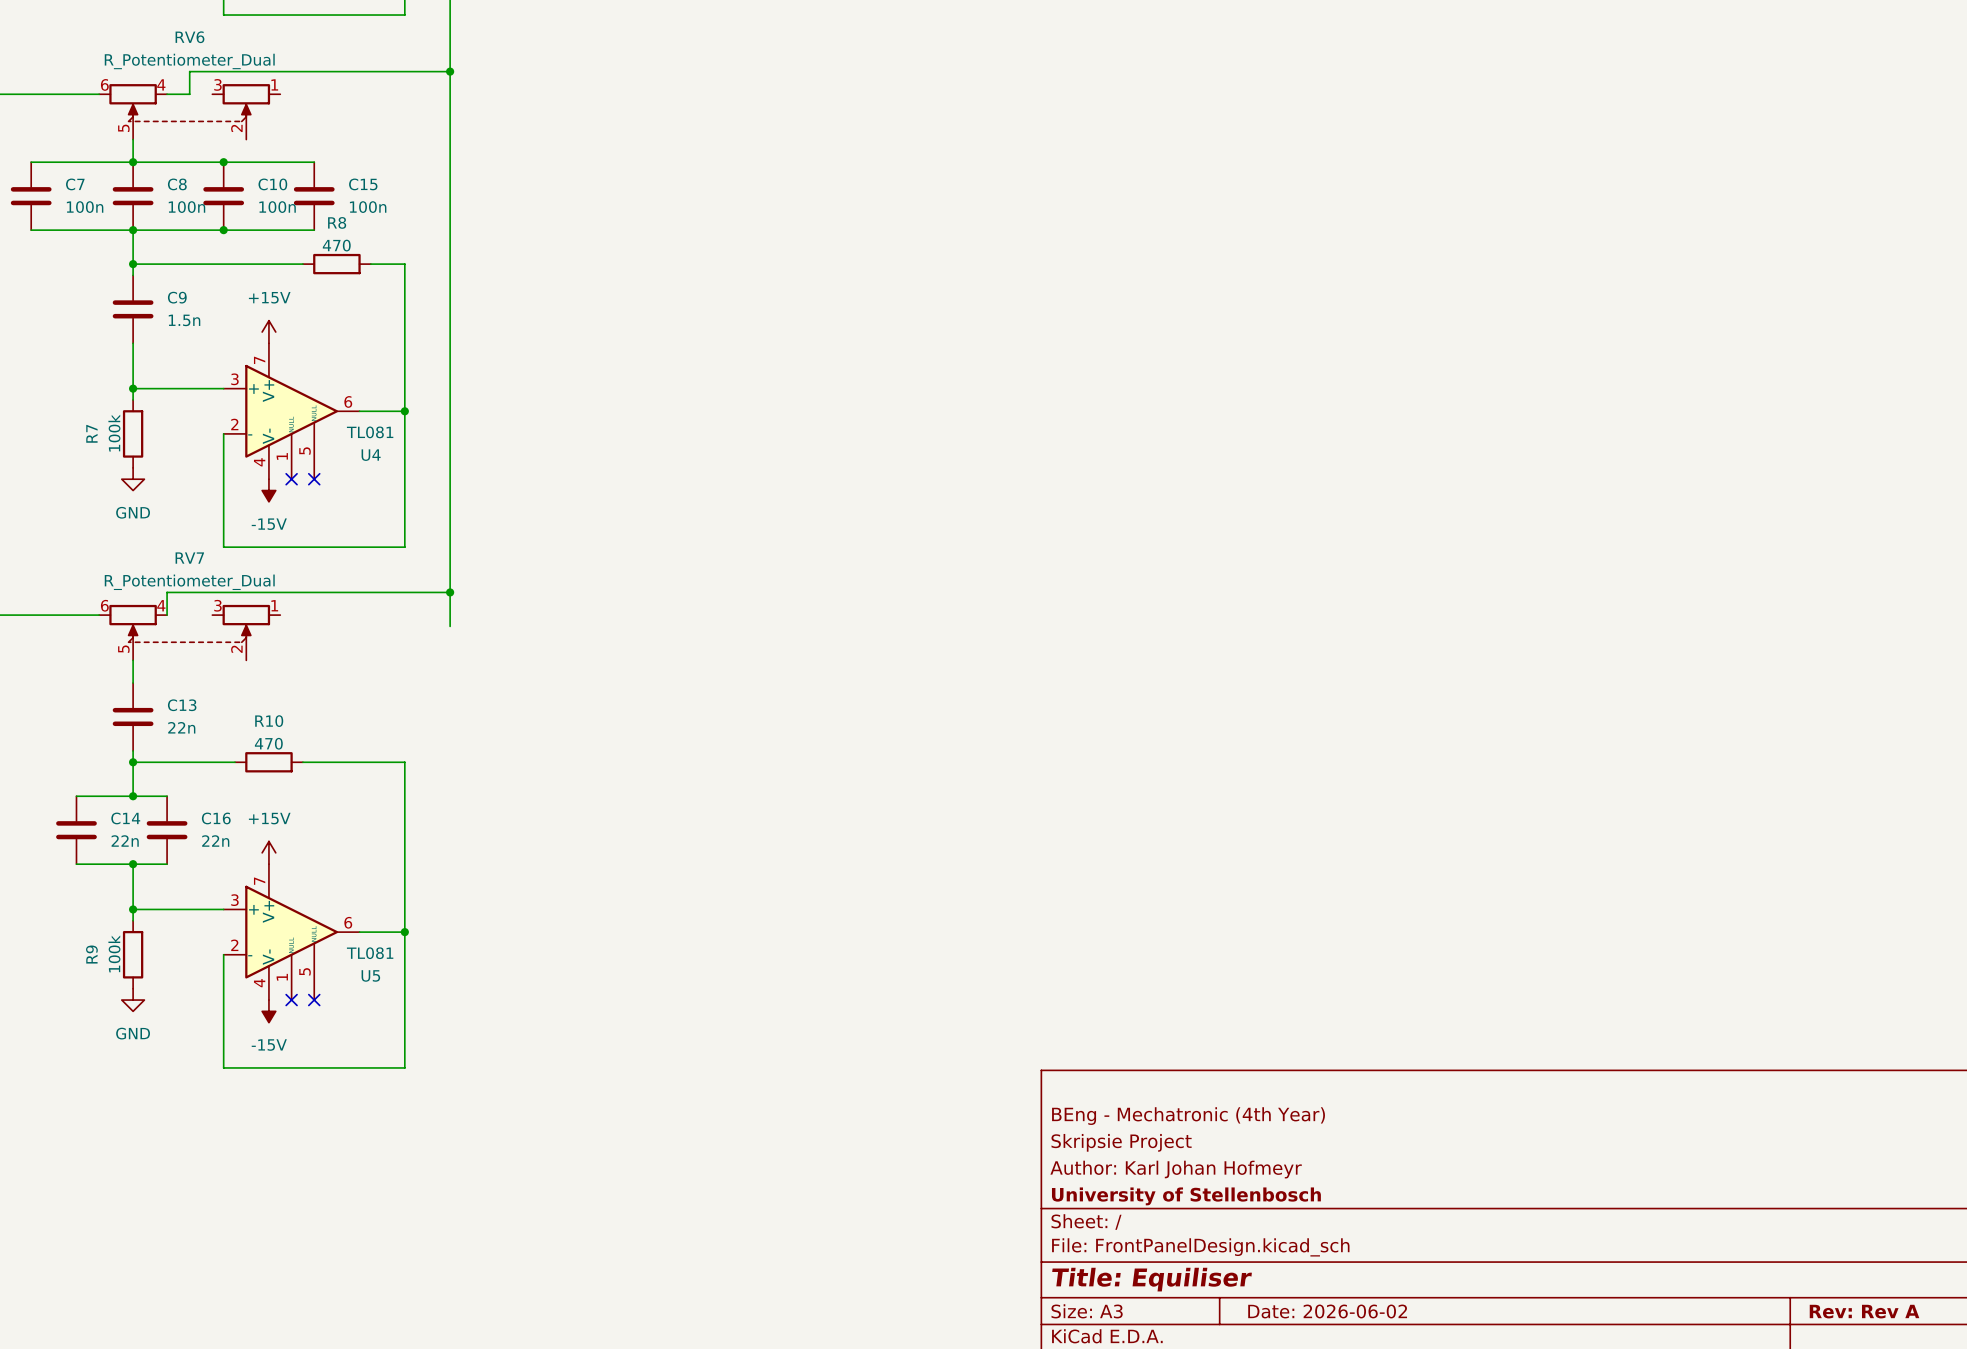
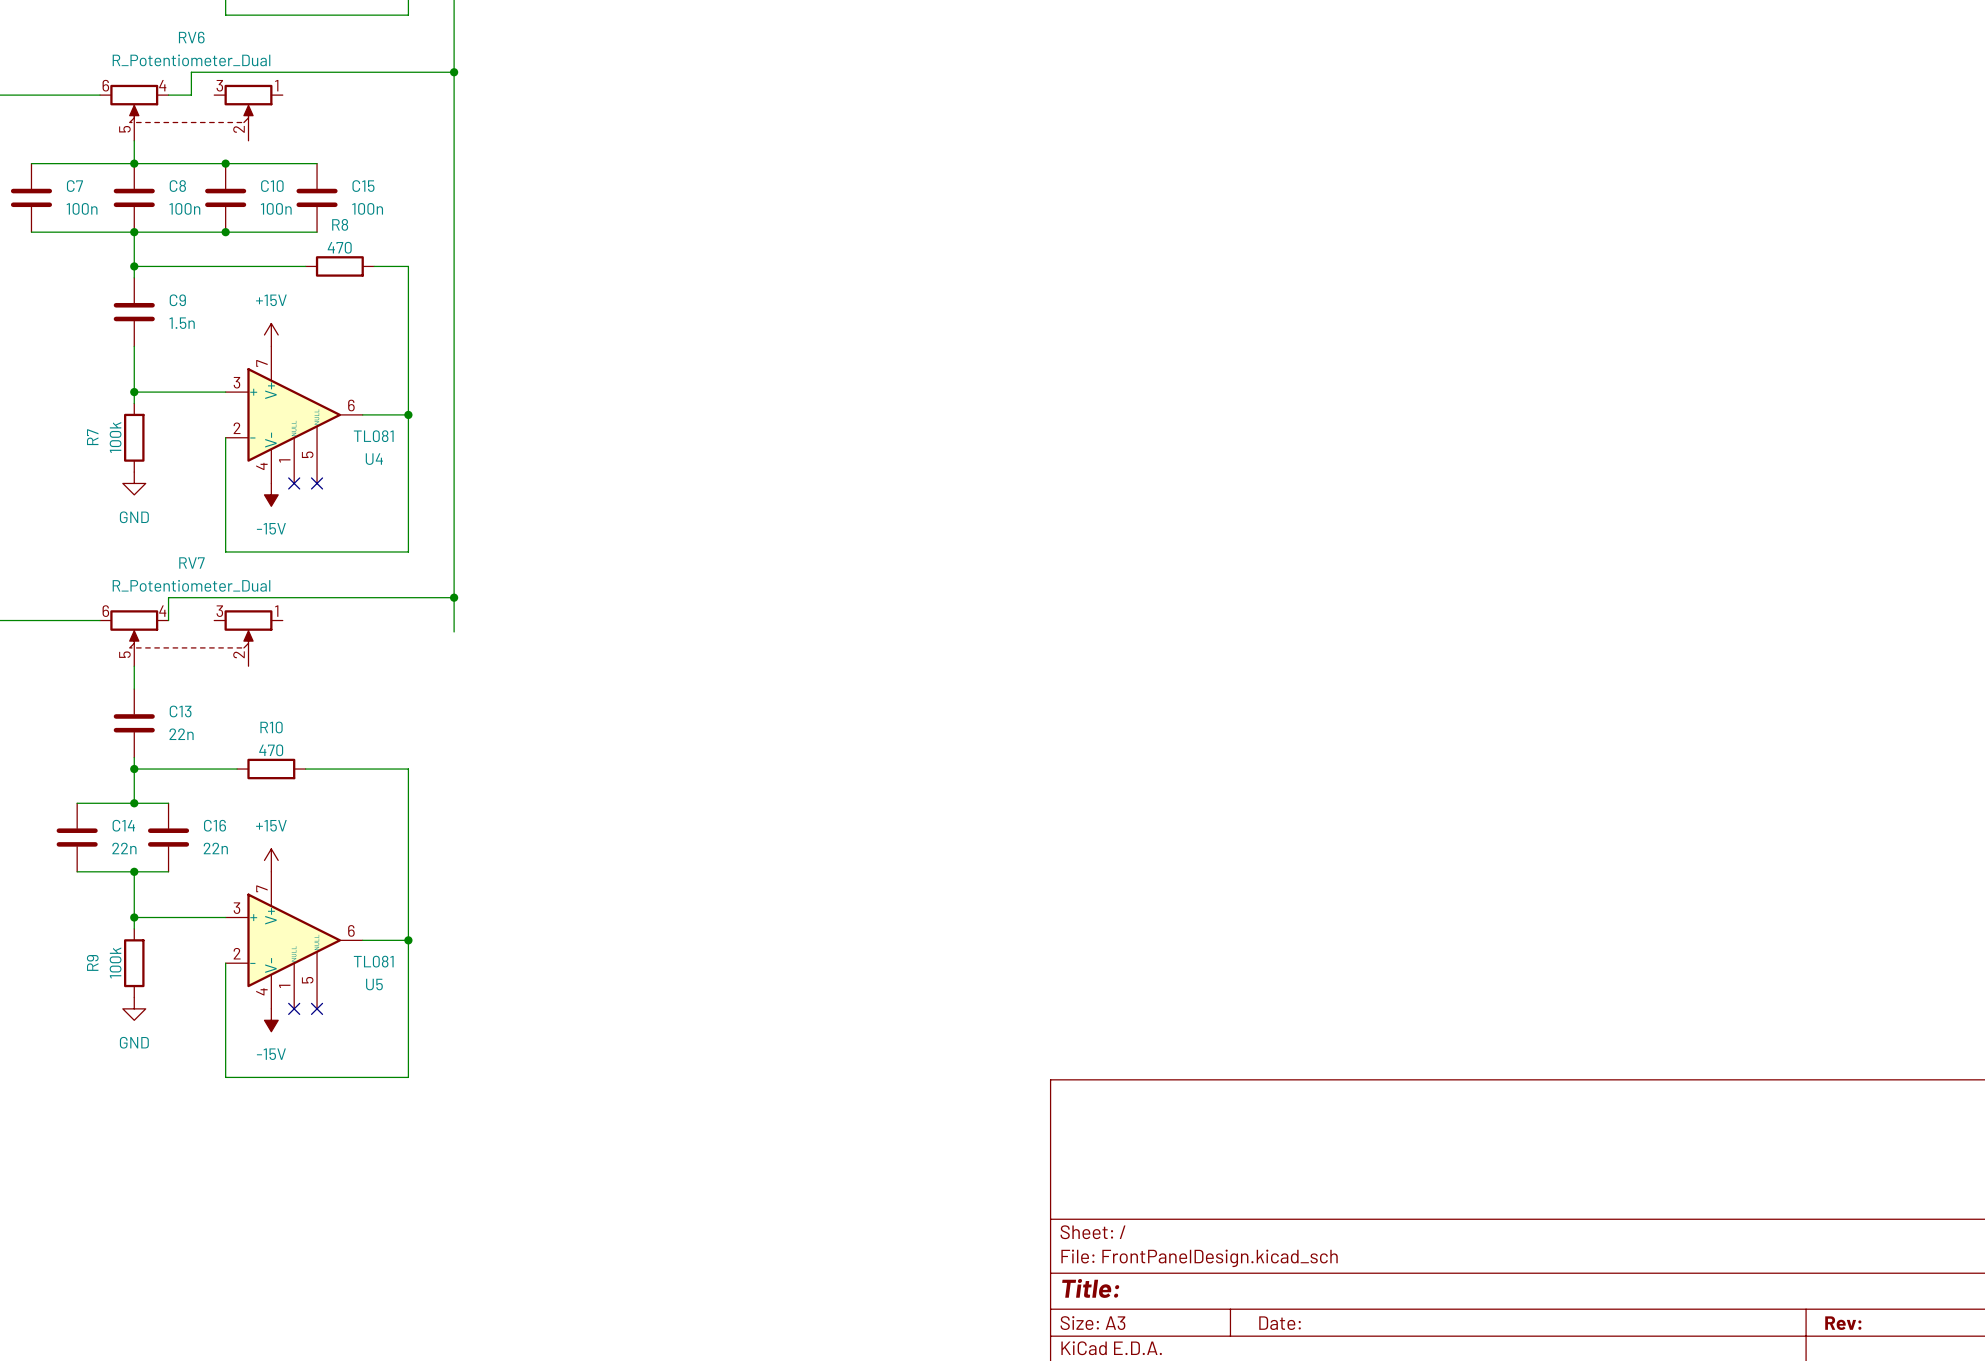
title block: BEng - Mechatronic (4th Year) (1188, 1116) -> none
title block: Skripsie Project (1121, 1142) -> none
title block: Author: Karl Johan Hofmeyr (1176, 1169) -> none
title block: University of Stellenbosch (1186, 1196) -> none
title block: Title: Equiliser (1152, 1279) -> Title: (1090, 1288)
title block: Date: 2026-06-02 (1327, 1311) -> Date: (1280, 1323)
title block: Rev: Rev A (1864, 1311) -> Rev: (1843, 1323)

